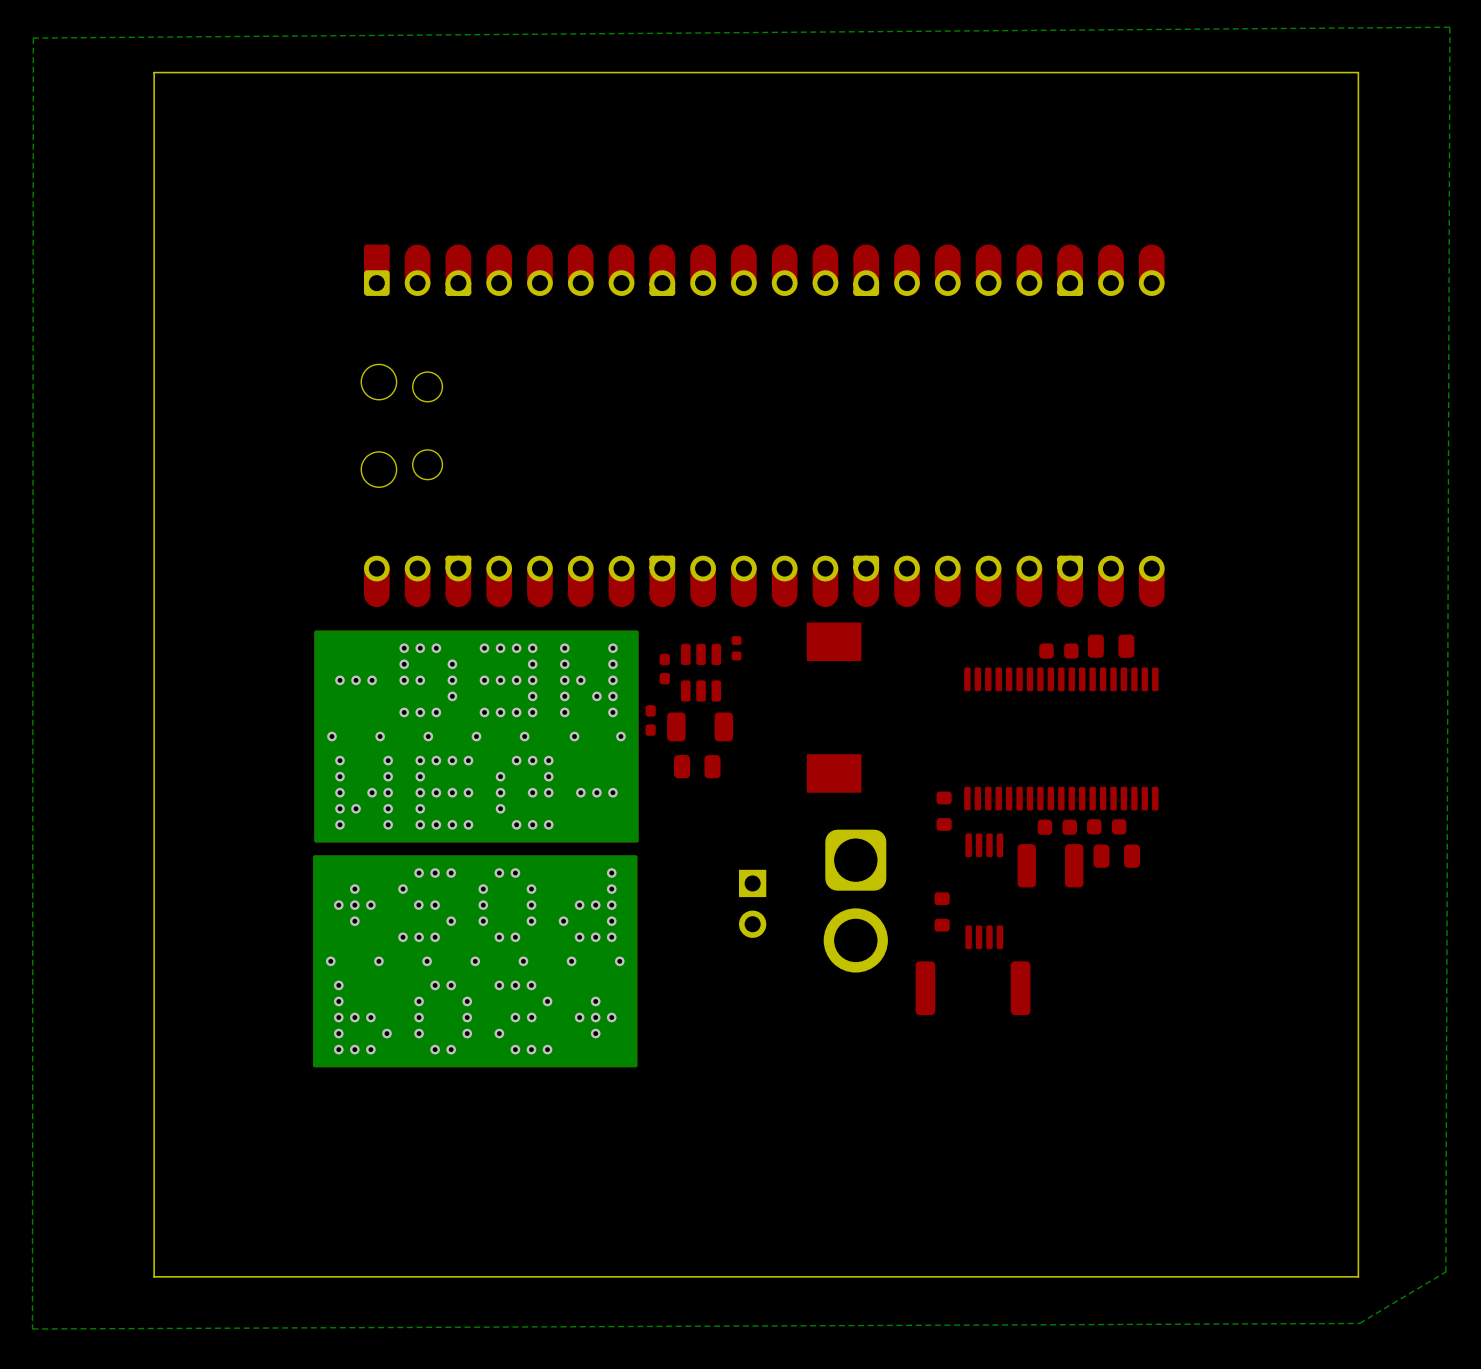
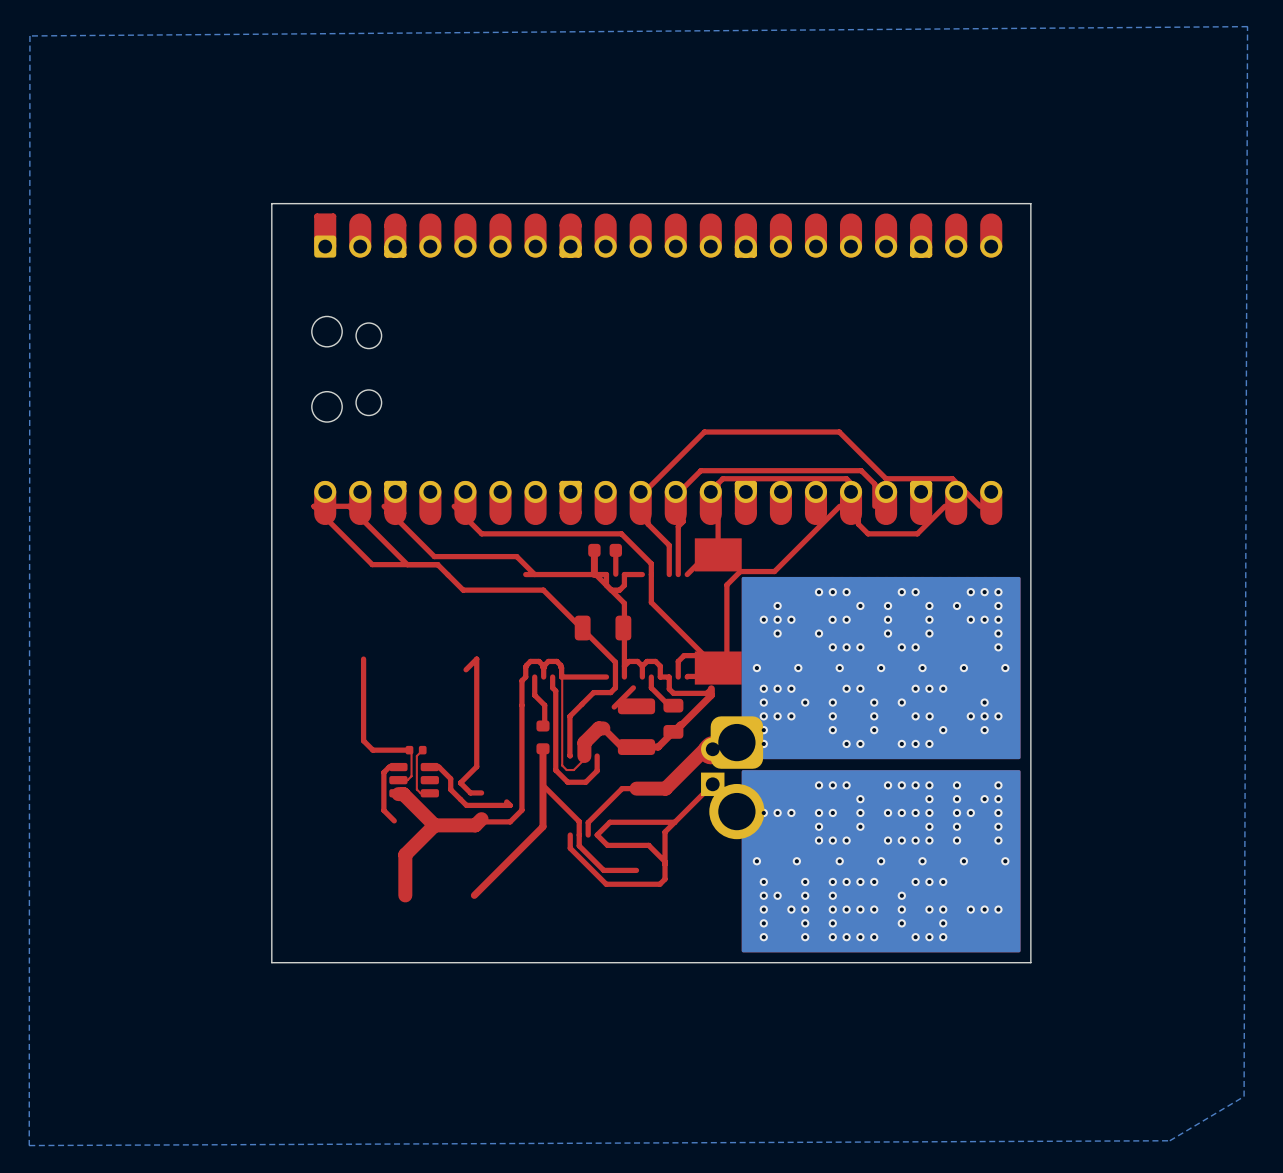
board edge: (1358, 72) (154, 72) (154, 1276) (1358, 1276) (1358, 72) -> (1030, 203) (1030, 962) (271, 962) (271, 203) (1030, 203)
top track: none -> (384, 506) (434, 556) (516, 556) (534, 574)
top track: none -> (454, 506) (481, 533) (621, 533) (651, 563) (651, 602) (711, 662)
top track: none -> (839, 506) (774, 571) (740, 571) (726, 584) (726, 669) (720, 676) (687, 677)
top track: none -> (874, 506) (874, 484) (861, 470) (700, 470) (683, 488) (683, 521) (678, 526) (678, 574)
top track: none -> (944, 506) (917, 533) (868, 533) (858, 524) (858, 490) (846, 478) (722, 478) (718, 483) (718, 543) (687, 574)
top track: none -> (980, 506) (952, 478) (886, 478) (839, 432) (704, 432) (648, 488) (648, 524) (669, 545) (669, 574)
drawing: [313, 630, 639, 1068] -> none
top track: none -> (594, 550) (594, 574)
part: none -> (605, 550)
top track: none -> (615, 550) (615, 574)
part: (1111, 646) -> none
via: (404, 648) -> none
via: (420, 648) -> none
via: (436, 648) -> none
via: (484, 648) -> none
via: (500, 648) -> none
via: (516, 648) -> none
via: (532, 648) -> none
via: (564, 648) -> none
via: (612, 648) -> none
part rotation: 0° (736, 648) -> 90° clockwise (416, 750)
part position: (736, 648) -> (416, 750)
part: (1058, 651) -> none
top track: none -> (407, 564) (349, 506) (313, 506) (372, 564) (437, 564) (463, 590) (543, 590) (615, 662) (615, 687) (610, 692) (593, 692) (569, 716) (570, 756)
via: (404, 664) -> none
via: (452, 664) -> none
via: (532, 664) -> none
via: (564, 664) -> none
top track: none -> (525, 574) (606, 574) (606, 585)
via: (612, 664) -> none
top track: none -> (595, 574) (624, 603) (624, 677)
top track: none -> (642, 574) (624, 574) (624, 585) (619, 590) (611, 590)
drawing: none -> [741, 576, 1021, 953]
part: (664, 669) -> none
part rotation: 0° (701, 672) -> 90° clockwise (414, 780)
part position: (701, 672) -> (414, 780)
via: (339, 680) -> none
via: (356, 680) -> none
via: (372, 680) -> none
via: (404, 680) -> none
via: (420, 680) -> none
via: (452, 680) -> none
via: (484, 680) -> none
via: (500, 680) -> none
via: (516, 680) -> none
via: (532, 680) -> none
via: (564, 680) -> none
via: (580, 680) -> none
via: (612, 680) -> none
via: none -> (819, 592)
via: none -> (832, 592)
via: none -> (846, 592)
via: none -> (901, 592)
via: none -> (915, 592)
via: none -> (970, 592)
via: none -> (984, 592)
via: none -> (998, 592)
via: (452, 696) -> none
via: (532, 696) -> none
via: (564, 696) -> none
via: (596, 696) -> none
via: (612, 696) -> none
via: none -> (777, 605)
via: none -> (860, 605)
via: none -> (888, 605)
via: none -> (929, 605)
via: none -> (957, 605)
via: none -> (998, 605)
via: (404, 712) -> none
via: (420, 712) -> none
via: (436, 712) -> none
via: (484, 712) -> none
via: (500, 712) -> none
via: (516, 712) -> none
via: (532, 712) -> none
via: (564, 712) -> none
via: (612, 712) -> none
via: none -> (763, 619)
via: none -> (777, 619)
via: none -> (791, 619)
via: none -> (832, 619)
via: none -> (846, 619)
via: none -> (888, 619)
via: none -> (929, 619)
via: none -> (970, 619)
via: none -> (984, 619)
via: none -> (998, 619)
part: (650, 720) -> none
via: none -> (777, 633)
via: none -> (819, 633)
via: none -> (888, 633)
via: none -> (929, 633)
via: none -> (998, 633)
via: (331, 736) -> none
via: (380, 736) -> none
via: (428, 736) -> none
via: (476, 736) -> none
via: (524, 736) -> none
via: (574, 736) -> none
via: (620, 736) -> none
via: none -> (832, 647)
via: none -> (846, 647)
via: none -> (860, 647)
via: none -> (901, 647)
via: none -> (915, 647)
via: none -> (998, 647)
top track: none -> (704, 655) (684, 655) (678, 661) (678, 677)
via: (339, 760) -> none
via: (388, 760) -> none
via: (420, 760) -> none
via: (436, 760) -> none
via: (452, 760) -> none
via: (468, 760) -> none
via: (516, 760) -> none
via: (532, 760) -> none
via: (548, 760) -> none
top track: none -> (363, 659) (363, 740) (372, 750) (409, 750) (411, 752) (411, 776) (407, 780) (398, 780)
part rotation: 0° (697, 766) -> 90° clockwise (673, 718)
part position: (697, 766) -> (673, 718)
top track: none -> (642, 666) (642, 677)
top track: none -> (642, 666) (637, 661) (629, 661) (624, 666)
top track: none -> (642, 666) (647, 661) (655, 661) (660, 666) (660, 677) (668, 677)
top track: none -> (543, 667) (538, 661) (530, 661) (525, 666) (525, 677) (521, 680) (521, 810) (510, 821) (482, 821) (480, 819)
top track: none -> (543, 667) (543, 677)
top track: none -> (543, 667) (548, 661) (556, 661) (561, 667) (561, 677)
via: none -> (756, 668)
via: none -> (798, 668)
via: none -> (839, 668)
via: none -> (881, 668)
via: none -> (922, 668)
via: none -> (963, 668)
via: none -> (1005, 668)
top track: none -> (466, 669) (476, 659) (476, 766) (460, 782) (470, 792) (481, 792)
via: (339, 776) -> none
via: (388, 776) -> none
via: (420, 776) -> none
via: (500, 776) -> none
via: (548, 776) -> none
top track: none -> (534, 677) (534, 695) (544, 705) (544, 724) (542, 726)
top track: none -> (552, 677) (552, 687) (555, 690) (555, 770) (567, 782) (585, 782) (597, 770) (597, 756)
top track: none -> (606, 677) (561, 677)
top track: none -> (651, 677) (651, 687) (669, 705) (673, 705)
top track: none -> (669, 677) (669, 689) (673, 693) (706, 693) (711, 688) (711, 695) (658, 747) (622, 747) (603, 728) (598, 728) (584, 742) (584, 759) (573, 770) (566, 770) (562, 765) (561, 677)
via: (339, 792) -> none
via: (372, 792) -> none
via: (388, 792) -> none
via: (420, 792) -> none
via: (436, 792) -> none
via: (452, 792) -> none
via: (468, 792) -> none
via: (500, 792) -> none
via: (532, 792) -> none
via: (548, 792) -> none
via: (580, 792) -> none
via: (596, 792) -> none
via: (612, 792) -> none
top track: none -> (633, 687) (614, 707)
via: none -> (763, 688)
via: none -> (777, 688)
via: none -> (791, 688)
via: none -> (846, 688)
via: none -> (860, 688)
via: none -> (915, 688)
via: none -> (929, 688)
via: none -> (943, 688)
via: (339, 808) -> none
via: (356, 808) -> none
via: (388, 808) -> none
via: (420, 808) -> none
via: (500, 808) -> none
part: (944, 811) -> none
via: none -> (763, 702)
via: none -> (805, 702)
via: none -> (832, 702)
via: none -> (874, 702)
via: none -> (901, 702)
via: none -> (984, 702)
via: (339, 824) -> none
via: (388, 824) -> none
via: (420, 824) -> none
via: (436, 824) -> none
via: (452, 824) -> none
via: (468, 824) -> none
via: (516, 824) -> none
via: (532, 824) -> none
via: (548, 824) -> none
part: (1106, 826) -> none
part: (1057, 827) -> none
via: none -> (763, 716)
via: none -> (777, 716)
via: none -> (791, 716)
via: none -> (832, 716)
via: none -> (874, 716)
via: none -> (915, 716)
via: none -> (929, 716)
via: none -> (970, 716)
via: none -> (984, 716)
via: none -> (998, 716)
via: none -> (763, 730)
via: none -> (832, 730)
via: none -> (874, 730)
via: none -> (943, 730)
via: none -> (984, 730)
part: none -> (542, 737)
part: (1116, 856) -> none
via: none -> (763, 743)
via: none -> (846, 743)
via: none -> (860, 743)
via: none -> (901, 743)
via: none -> (915, 743)
via: none -> (929, 743)
part rotation: 0° (1050, 865) -> 90° clockwise (636, 726)
part position: (1050, 865) -> (636, 726)
top track: none -> (422, 750) (416, 756) (416, 789) (420, 793) (429, 793)
top track: none -> (710, 751) (712, 749) (705, 749) (665, 788) (622, 788) (588, 822) (588, 835)
via: (419, 873) -> none
via: (435, 873) -> none
via: (451, 873) -> none
via: (499, 873) -> none
via: (515, 873) -> none
via: (611, 873) -> none
top track: none -> (398, 767) (389, 767) (383, 772) (383, 810) (394, 820)
top track: none -> (429, 767) (438, 767) (450, 778) (450, 789) (466, 805) (510, 805) (506, 801)
via: (354, 889) -> none
via: (403, 889) -> none
via: (483, 889) -> none
via: (531, 889) -> none
via: (611, 889) -> none
part rotation: 0° (752, 903) -> 180° (712, 766)
part position: (752, 903) -> (712, 766)
via: (338, 905) -> none
via: (354, 905) -> none
via: (370, 905) -> none
via: (418, 905) -> none
via: (435, 905) -> none
via: (483, 905) -> none
via: (531, 905) -> none
via: (579, 905) -> none
via: (595, 905) -> none
via: (611, 905) -> none
top track: none -> (712, 784) (665, 832) (665, 879) (659, 884) (606, 884) (570, 848) (570, 835)
top track: none -> (542, 785) (579, 821) (579, 845) (603, 870) (636, 870)
via: none -> (819, 785)
via: none -> (832, 785)
via: none -> (846, 785)
via: none -> (888, 785)
via: none -> (901, 785)
via: none -> (915, 785)
via: none -> (929, 785)
via: none -> (957, 785)
via: none -> (998, 785)
part: (942, 911) -> none
top track: none -> (398, 794) (403, 794) (434, 825)
via: (354, 921) -> none
via: (451, 921) -> none
via: (483, 921) -> none
via: (531, 921) -> none
via: (563, 921) -> none
via: (611, 921) -> none
via: none -> (860, 799)
via: none -> (929, 799)
via: none -> (957, 799)
via: none -> (984, 799)
via: none -> (998, 799)
top track: none -> (542, 804) (542, 748) (542, 826) (474, 895)
via: (403, 937) -> none
via: (419, 937) -> none
via: (435, 937) -> none
via: (499, 937) -> none
via: (515, 937) -> none
via: (579, 937) -> none
via: (595, 937) -> none
via: (611, 937) -> none
via: none -> (763, 812)
via: none -> (777, 812)
via: none -> (791, 812)
via: none -> (819, 812)
via: none -> (832, 812)
via: none -> (860, 812)
via: none -> (888, 812)
via: none -> (901, 812)
via: none -> (915, 812)
via: none -> (929, 812)
via: none -> (957, 812)
via: none -> (970, 812)
via: none -> (998, 812)
top track: none -> (481, 819) (475, 825) (434, 825)
top track: none -> (674, 822) (609, 822) (597, 835) (607, 845) (648, 845) (665, 861)
top track: none -> (434, 825) (405, 854) (405, 895)
via: none -> (819, 826)
via: none -> (860, 826)
via: none -> (929, 826)
via: none -> (957, 826)
via: none -> (998, 826)
via: (330, 961) -> none
via: (378, 961) -> none
via: (427, 961) -> none
via: (475, 961) -> none
via: (523, 961) -> none
via: (571, 961) -> none
via: (619, 961) -> none
via: none -> (819, 840)
via: none -> (832, 840)
via: none -> (846, 840)
via: none -> (888, 840)
via: none -> (901, 840)
via: none -> (915, 840)
via: none -> (929, 840)
via: none -> (957, 840)
via: none -> (998, 840)
via: (338, 985) -> none
via: (435, 985) -> none
via: (451, 985) -> none
via: (499, 985) -> none
via: (515, 985) -> none
via: (531, 985) -> none
via: none -> (756, 861)
via: none -> (796, 861)
via: none -> (839, 861)
via: none -> (881, 861)
via: none -> (922, 861)
via: none -> (963, 861)
via: none -> (1005, 861)
via: (338, 1001) -> none
via: (419, 1001) -> none
via: (467, 1001) -> none
via: (547, 1001) -> none
via: (595, 1001) -> none
via: (338, 1017) -> none
via: (354, 1017) -> none
via: (370, 1017) -> none
via: (419, 1017) -> none
via: (467, 1017) -> none
via: (515, 1017) -> none
via: (531, 1017) -> none
via: (579, 1017) -> none
via: (595, 1017) -> none
via: (611, 1017) -> none
via: none -> (763, 881)
via: none -> (805, 881)
via: none -> (832, 881)
via: none -> (846, 881)
via: none -> (860, 881)
via: none -> (874, 881)
via: none -> (915, 881)
via: none -> (929, 881)
via: none -> (943, 881)
via: (338, 1033) -> none
via: (386, 1033) -> none
via: (419, 1033) -> none
via: (467, 1033) -> none
via: (499, 1033) -> none
via: (595, 1033) -> none
via: none -> (763, 895)
via: none -> (777, 895)
via: none -> (805, 895)
via: none -> (832, 895)
via: none -> (901, 895)
via: (338, 1049) -> none
via: (354, 1049) -> none
via: (370, 1049) -> none
via: (435, 1049) -> none
via: (451, 1049) -> none
via: (515, 1049) -> none
via: (531, 1049) -> none
via: (547, 1049) -> none
via: none -> (763, 909)
via: none -> (791, 909)
via: none -> (805, 909)
via: none -> (832, 909)
via: none -> (846, 909)
via: none -> (860, 909)
via: none -> (874, 909)
via: none -> (901, 909)
via: none -> (929, 909)
via: none -> (943, 909)
via: none -> (970, 909)
via: none -> (984, 909)
via: none -> (998, 909)
via: none -> (763, 923)
via: none -> (805, 923)
via: none -> (832, 923)
via: none -> (901, 923)
via: none -> (943, 923)
via: none -> (763, 937)
via: none -> (805, 937)
via: none -> (832, 937)
via: none -> (846, 937)
via: none -> (860, 937)
via: none -> (874, 937)
via: none -> (915, 937)
via: none -> (929, 937)
via: none -> (943, 937)

